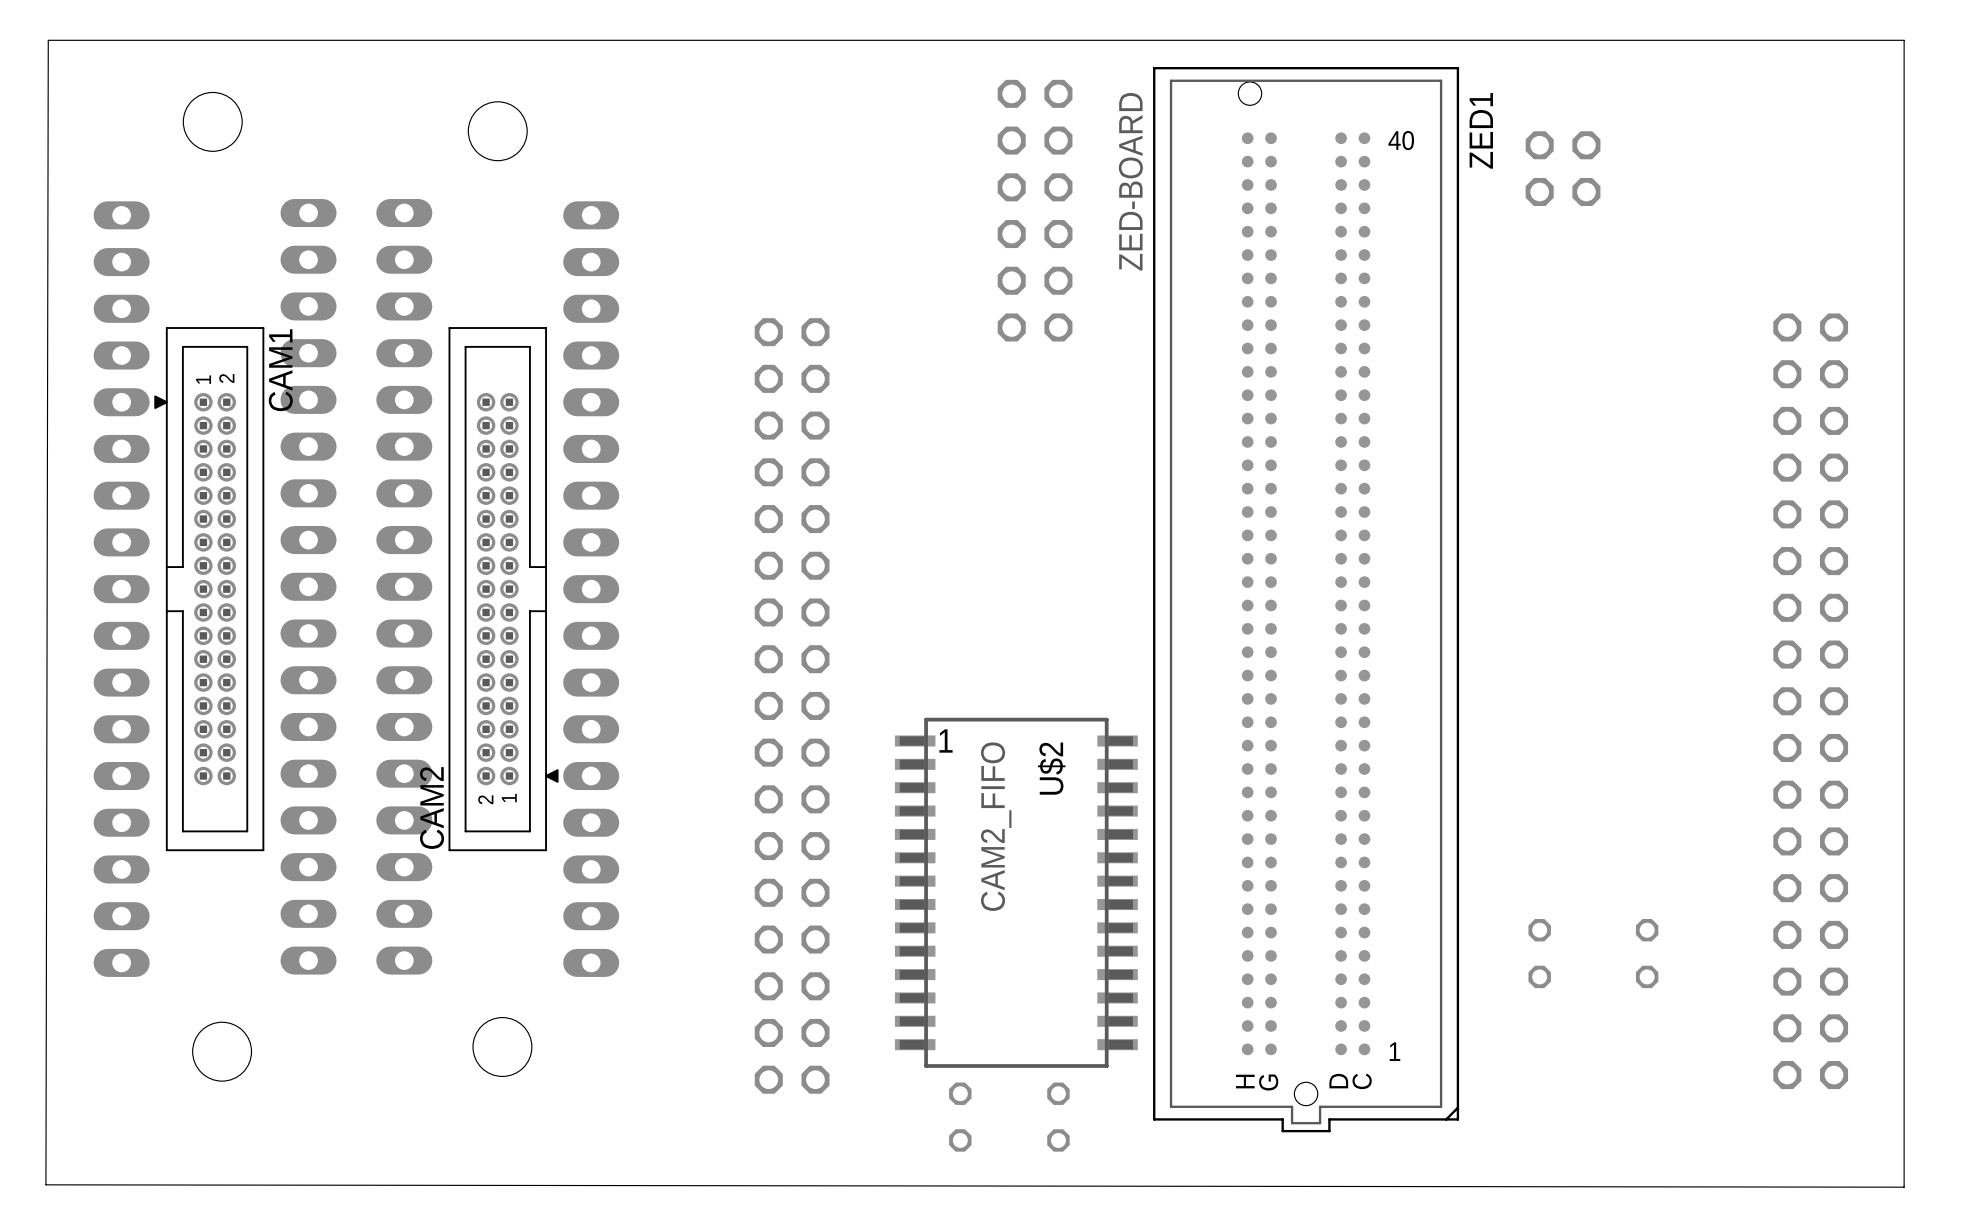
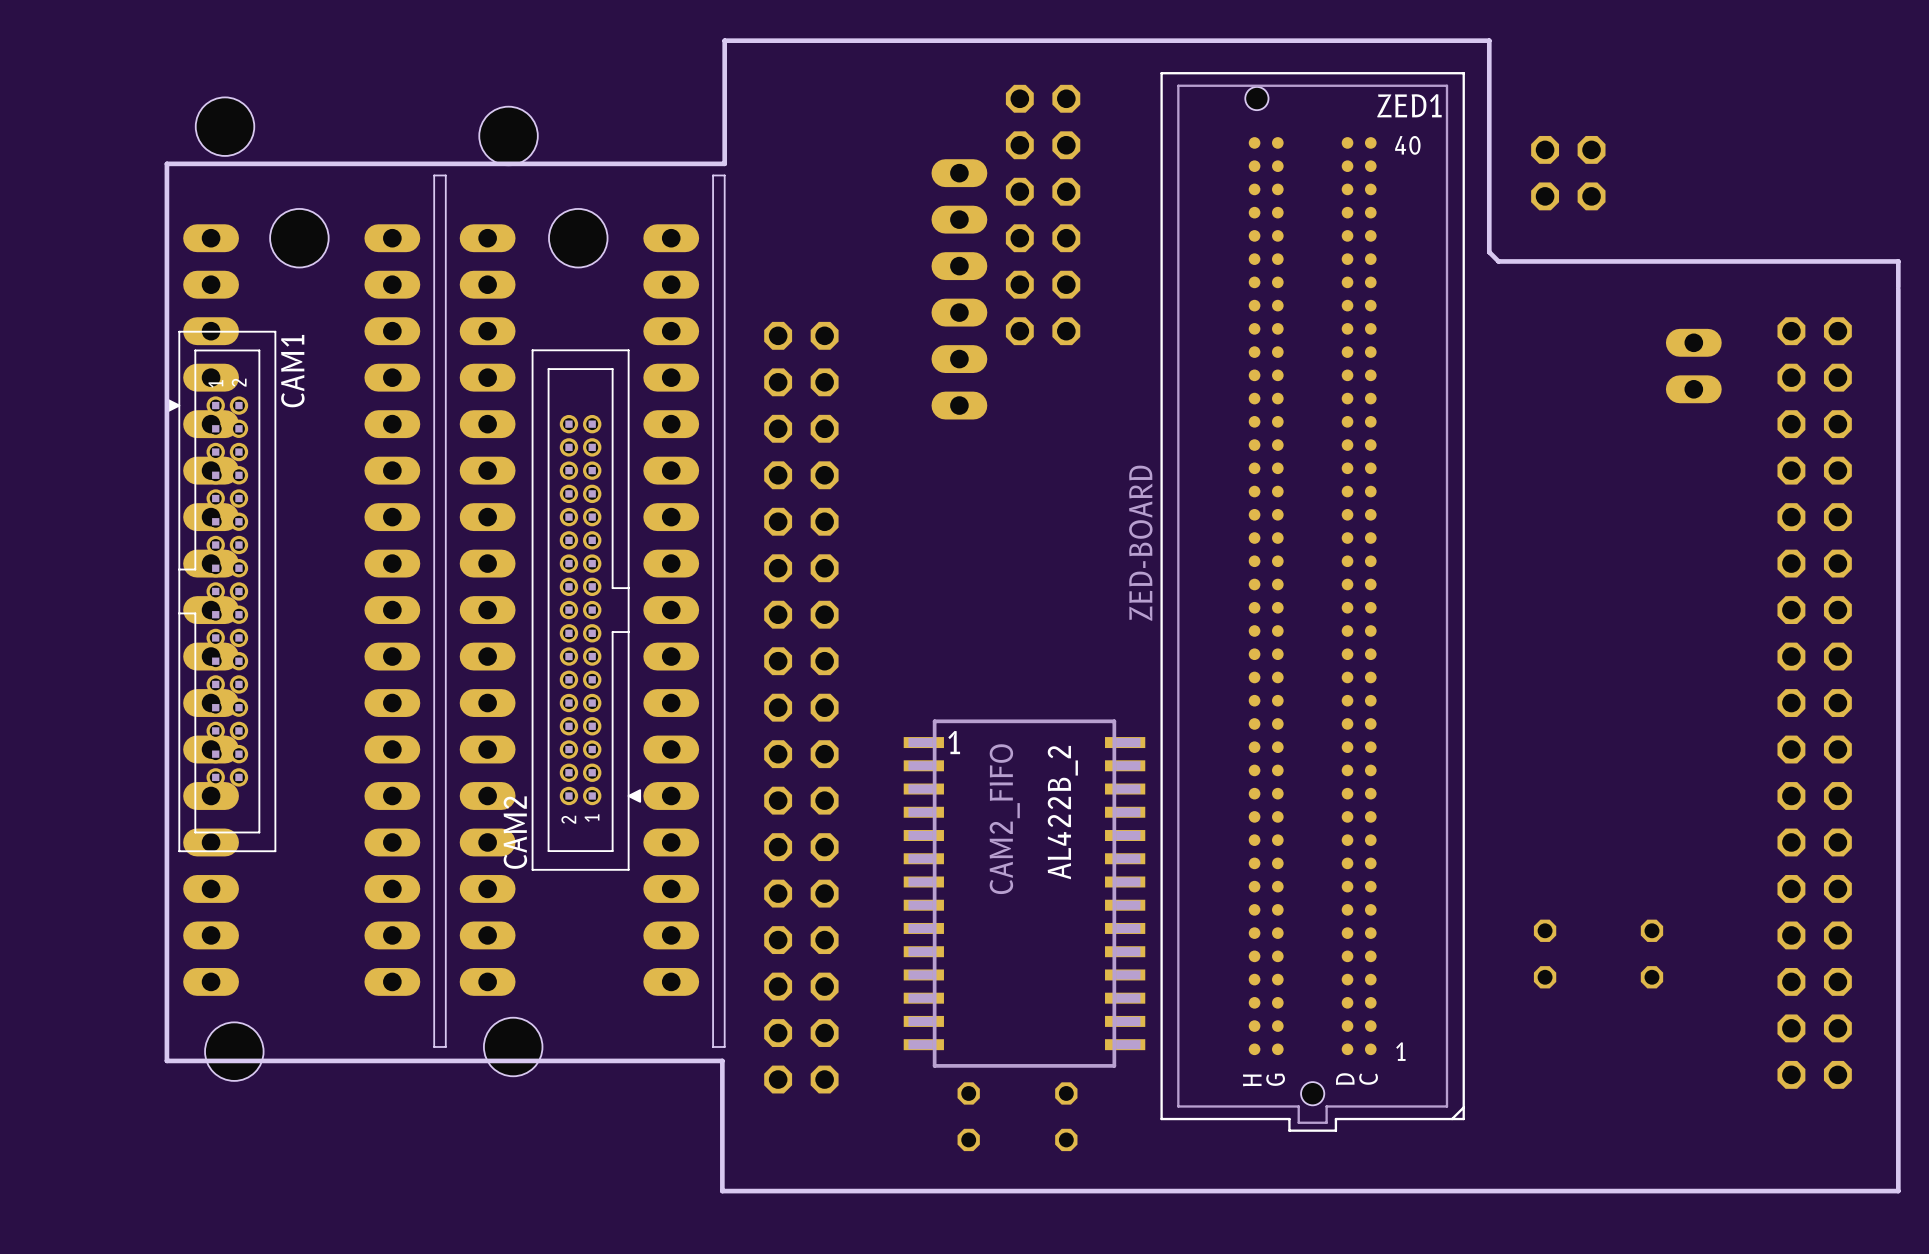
board edge: (1904, 40) (48, 40) (45, 1184) (1904, 1187) (1904, 40) -> none
ZED1 name rotation: 0° (1481, 130) -> 90° clockwise (1409, 105)
ZED1 name position: ZED1 (1481, 130) -> ZED1 (1409, 105)
board edge: none -> (445, 175) (434, 175) (434, 1046) (445, 1046) (445, 175)
board edge: none -> (724, 175) (713, 175) (713, 1046) (724, 1046) (724, 175)
ZED1 value position: ZED-BOARD (1130, 181) -> ZED-BOARD (1140, 543)
hole: none -> (299, 238)
hole: none -> (578, 238)
board edge: none -> (1898, 287) (1898, 261) (1498, 261) (1489, 252) (1489, 40) (724, 40) (724, 163) (166, 163) (166, 1060) (722, 1060) (722, 1191) (1898, 1191) (1898, 289)
part: none -> (959, 289)
part: none -> (1693, 366)
part: (308, 586) -> none
part position: (404, 586) -> (392, 610)
part: (121, 589) -> none
CAM2 position: (503, 589) -> (586, 610)
part: (591, 589) -> none
part: none -> (211, 610)
part: none -> (487, 610)
part: none -> (671, 610)
U$2 name: U$2 (1051, 768) -> AL422B_2 (1062, 812)

